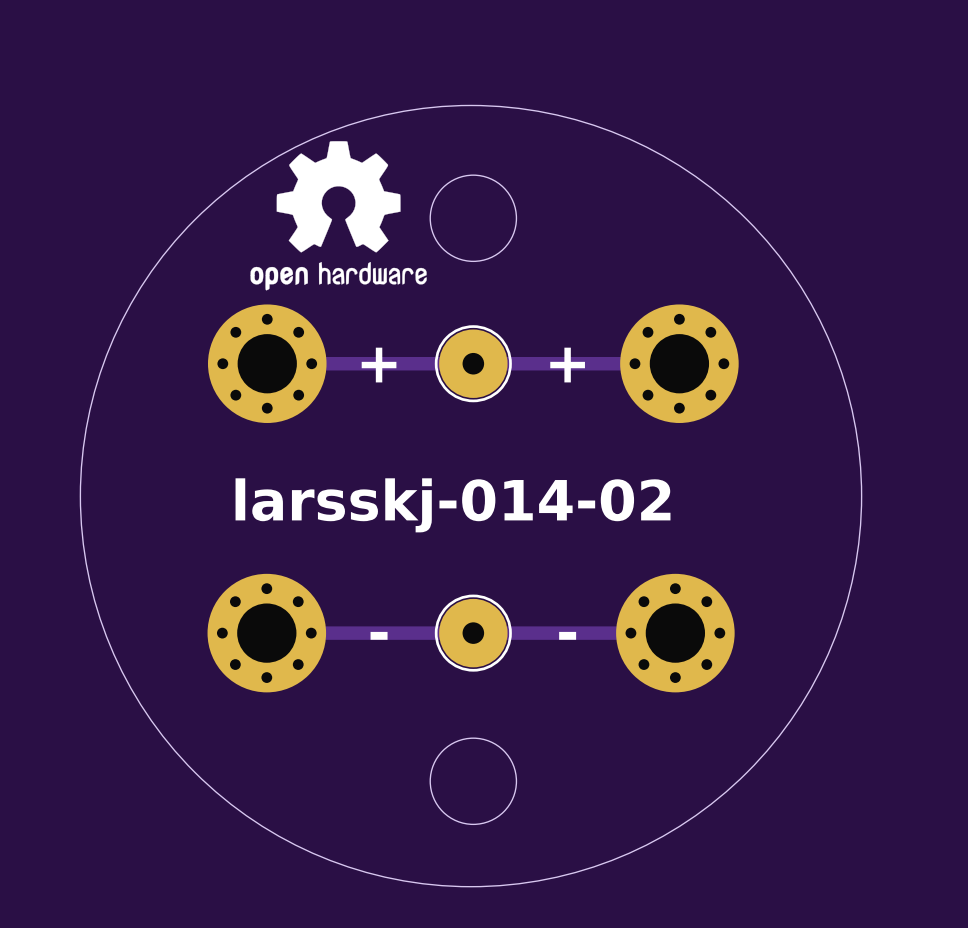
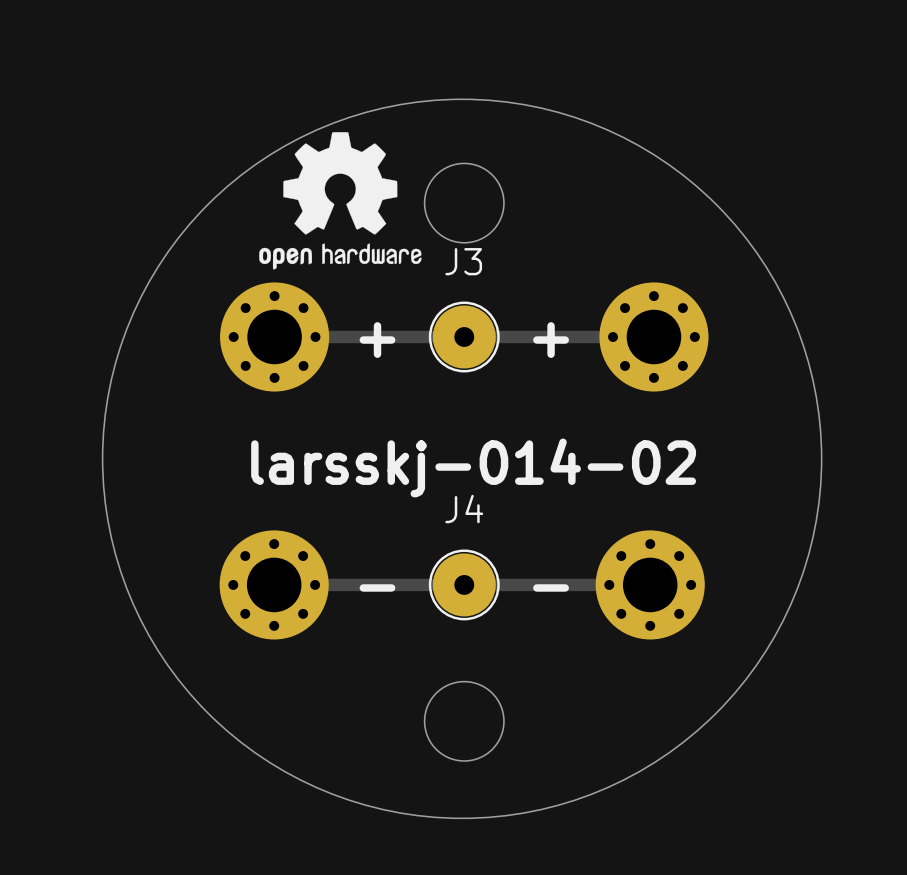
J3 name: none -> J3 (463, 261)
J4 name: none -> J4 (464, 509)

